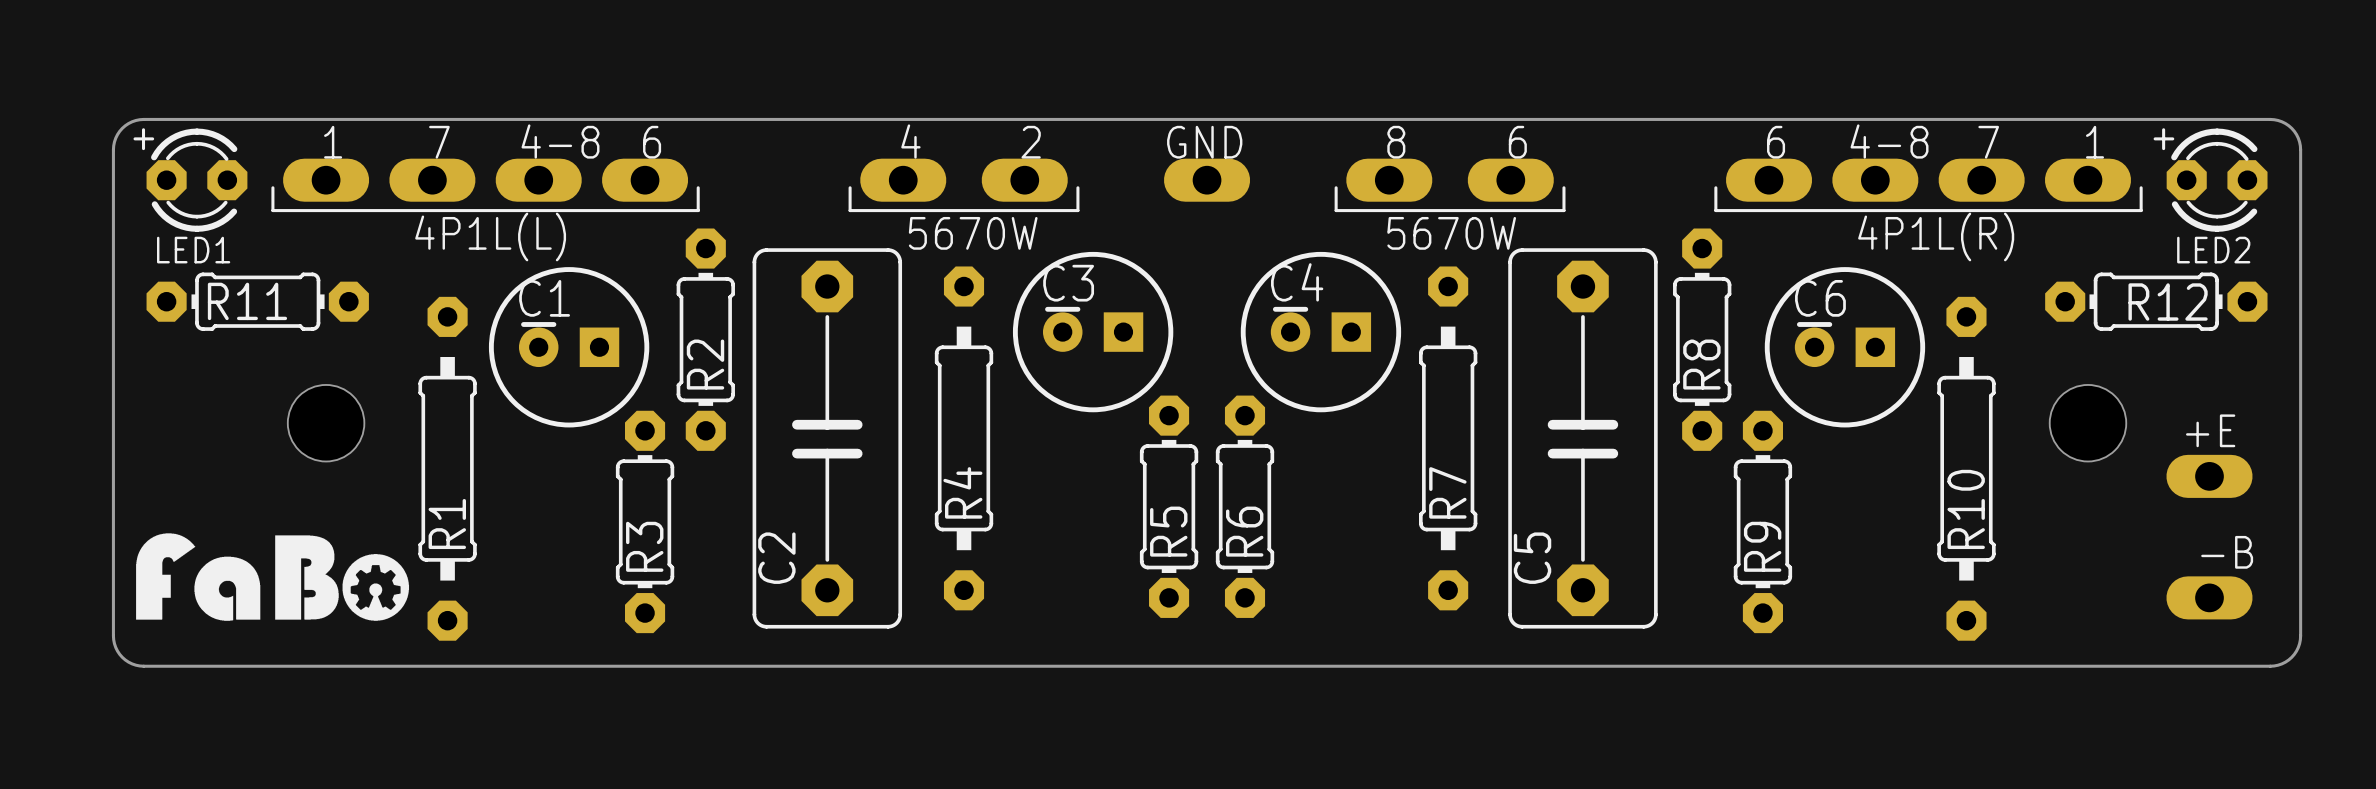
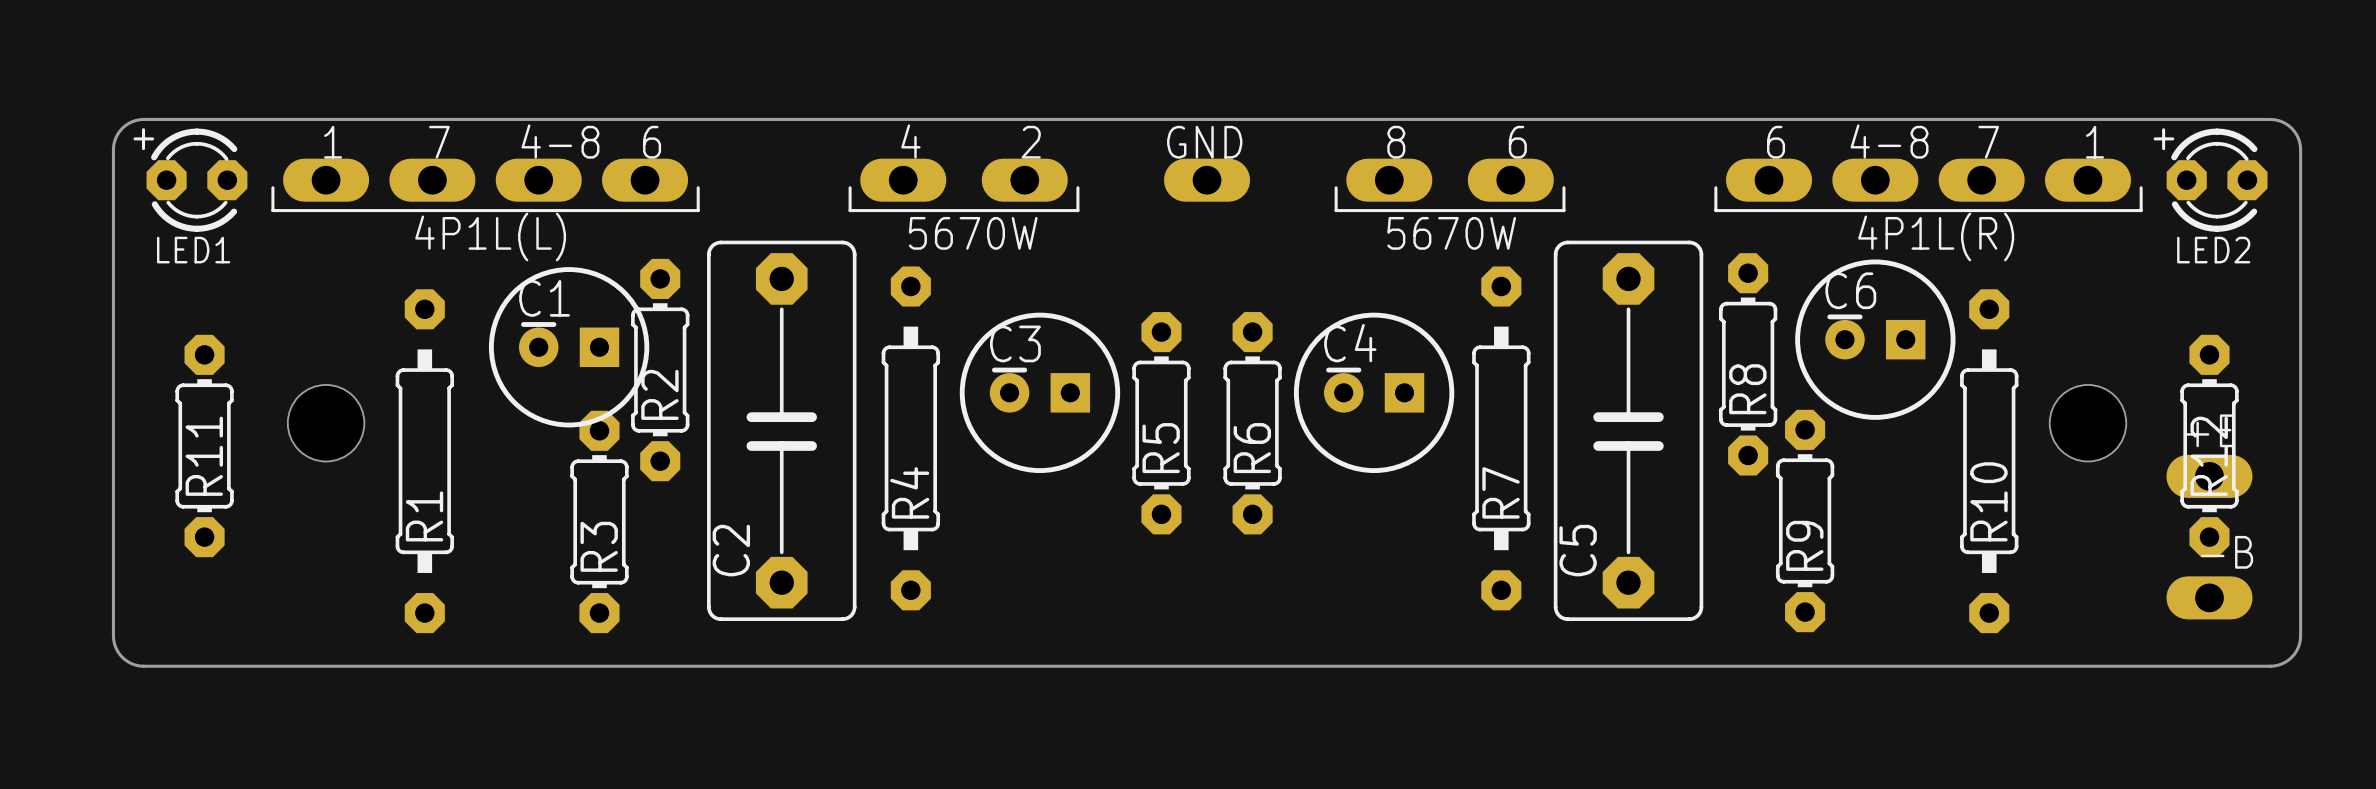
R11 rotation: 0° (257, 301) -> 90° counterclockwise (204, 446)
R11 position: (257, 301) -> (204, 446)
R12 rotation: 0° (2156, 301) -> 90° clockwise (2209, 446)
R12 position: (2156, 301) -> (2209, 446)
C3 position: (1093, 332) -> (1039, 392)
C4 position: (1320, 332) -> (1374, 392)
R2 position: (705, 339) -> (660, 370)
R8 position: (1702, 339) -> (1748, 364)
C6 position: (1844, 347) -> (1875, 339)
C2 position: (827, 438) -> (781, 430)
R4 position: (964, 438) -> (910, 438)
R7 position: (1448, 438) -> (1501, 438)
C5 position: (1582, 438) -> (1628, 430)
R1 position: (447, 468) -> (424, 461)
R10 position: (1966, 468) -> (1989, 461)
R5 position: (1169, 506) -> (1161, 423)
R6 position: (1245, 506) -> (1252, 423)
R3 position: (645, 521) -> (599, 521)
R9 position: (1762, 521) -> (1805, 520)
drawing: [136, 533, 410, 621] -> none

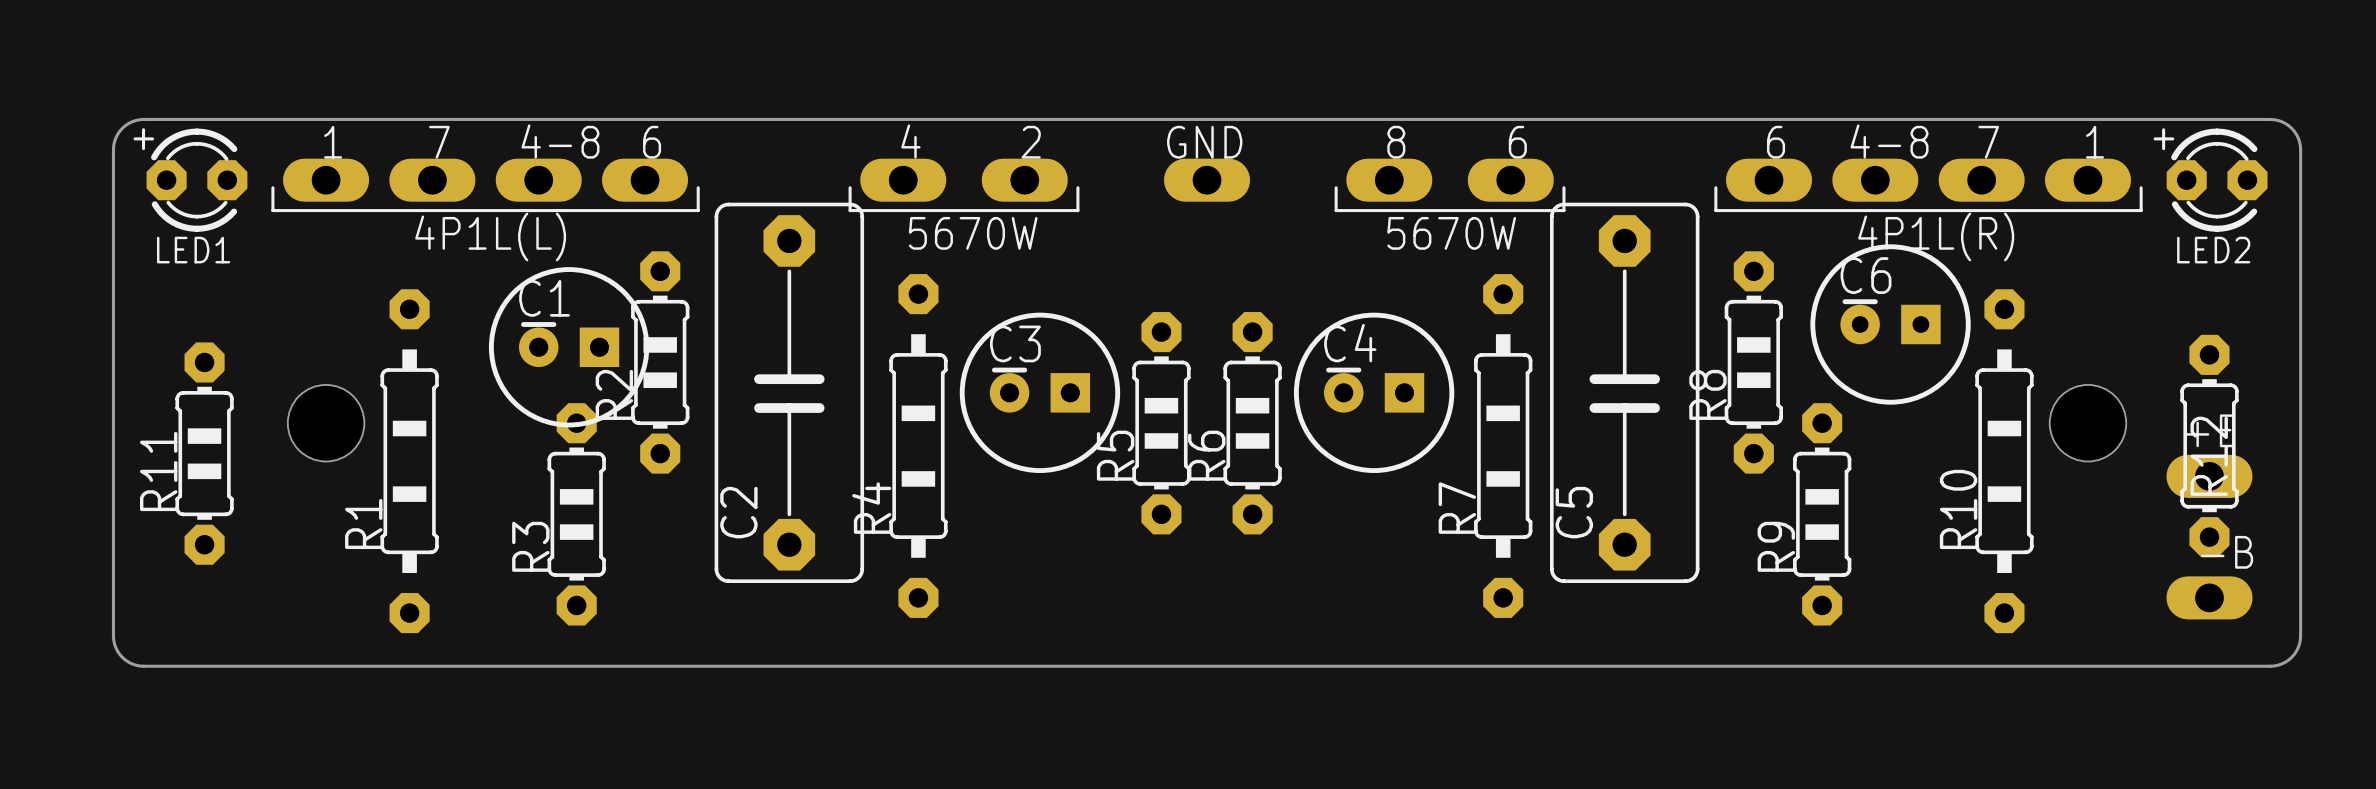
R8 footprint: [1718, 253, 1778, 476] -> [1724, 251, 1783, 474]
R2 footprint: [631, 258, 690, 482] -> [631, 251, 690, 474]
C6 footprint: [1795, 259, 1956, 420] -> [1810, 244, 1971, 405]
R4 footprint: [881, 266, 941, 611] -> [889, 274, 948, 618]
R7 footprint: [1472, 266, 1531, 611] -> [1474, 274, 1533, 618]
R1 footprint: [395, 289, 454, 634] -> [380, 289, 439, 634]
R10 footprint: [1960, 289, 2019, 634] -> [1975, 289, 2034, 634]
C6 name position: C6 (1850, 290) -> C6 (1866, 275)
R5 footprint: [1132, 312, 1191, 535] -> [1132, 312, 1191, 535]
R6 footprint: [1223, 312, 1282, 535] -> [1223, 312, 1282, 535]
R11 footprint: [175, 334, 234, 558] -> [175, 342, 234, 565]
R9 footprint: [1775, 409, 1835, 633] -> [1793, 403, 1852, 626]
R3 footprint: [570, 410, 629, 634] -> [547, 403, 606, 626]
C2 position: (781, 430) -> (789, 392)
C5 position: (1628, 430) -> (1624, 392)
R6 name position: R6 (1252, 448) -> R6 (1206, 455)
R7 name position: R7 (1501, 492) -> R7 (1457, 508)

